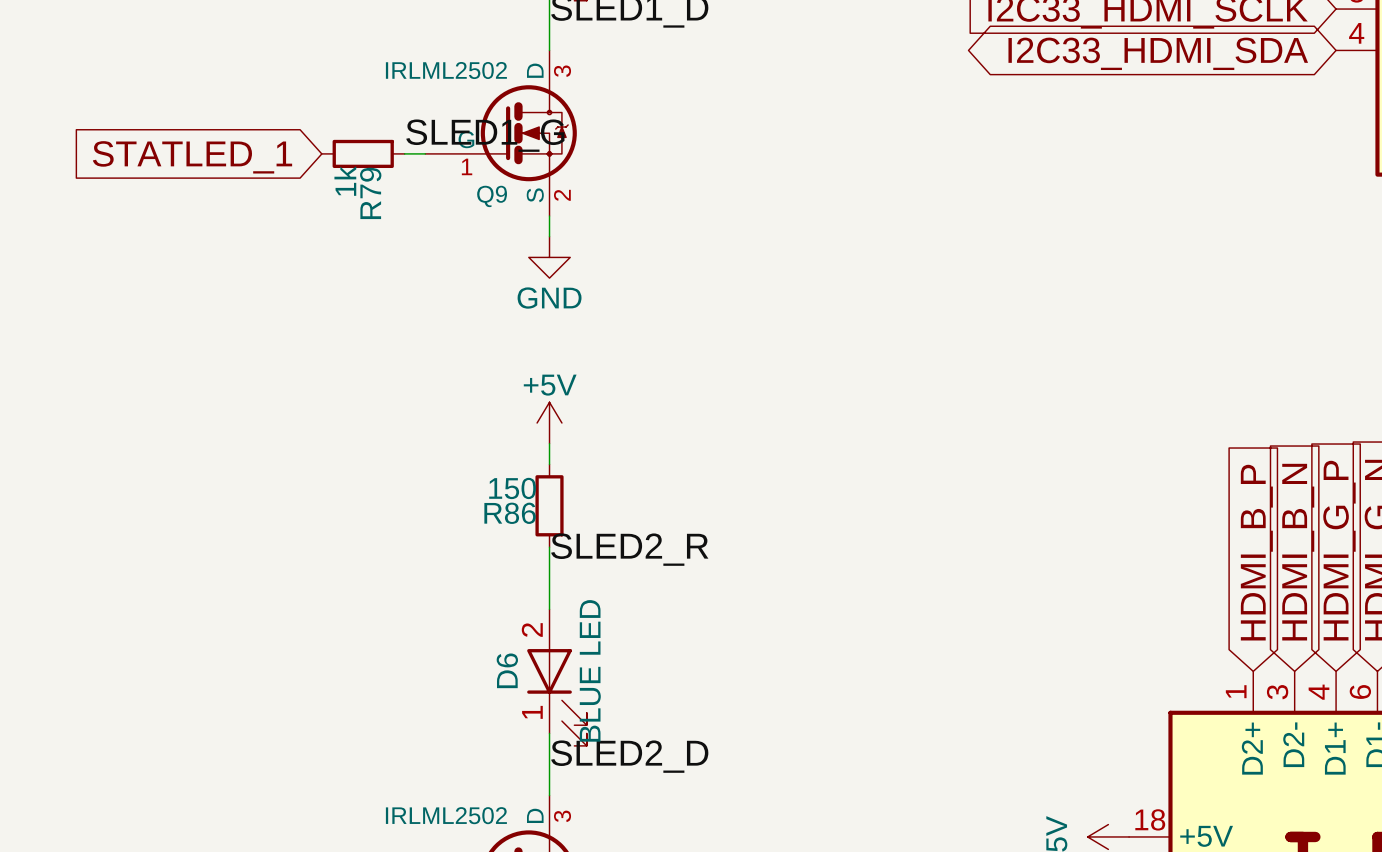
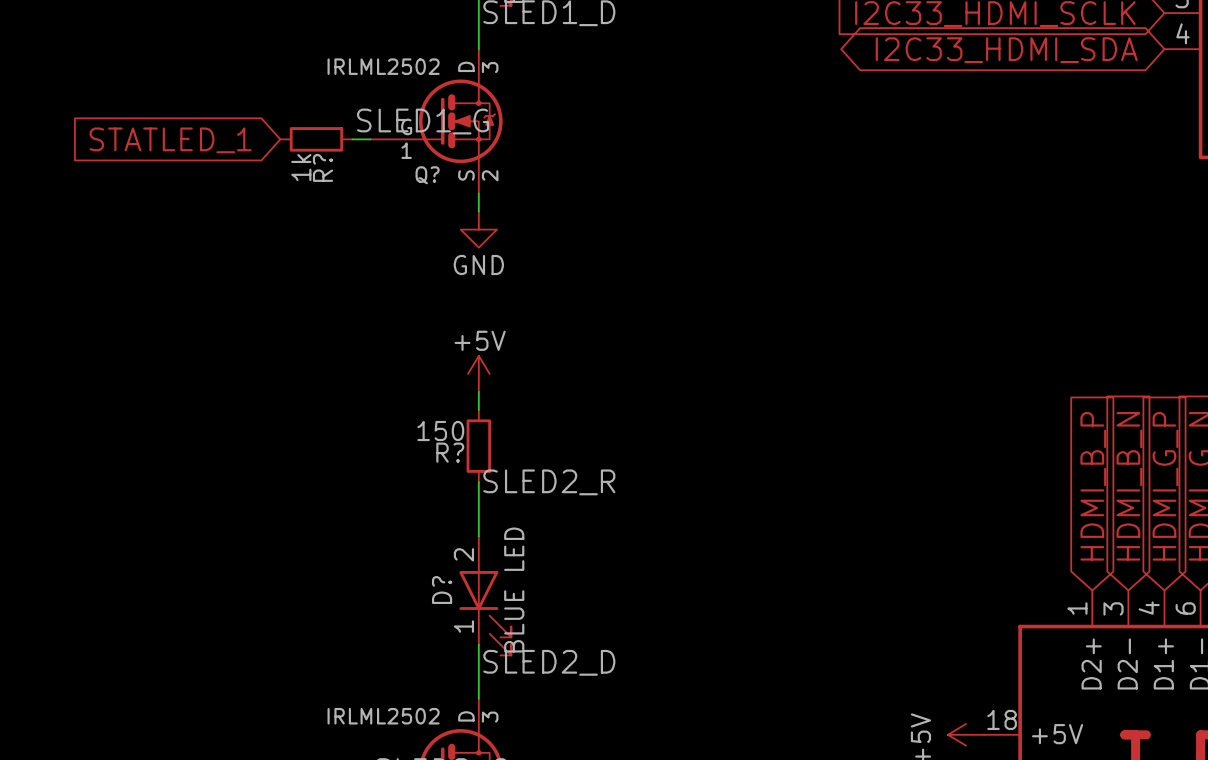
R79 name: R79 (370, 193) -> R? (322, 167)
Q9 name: Q9 (492, 196) -> Q? (427, 175)
R86 name: R86 (510, 513) -> R? (450, 452)
D6 name: D6 (507, 670) -> D? (442, 590)

